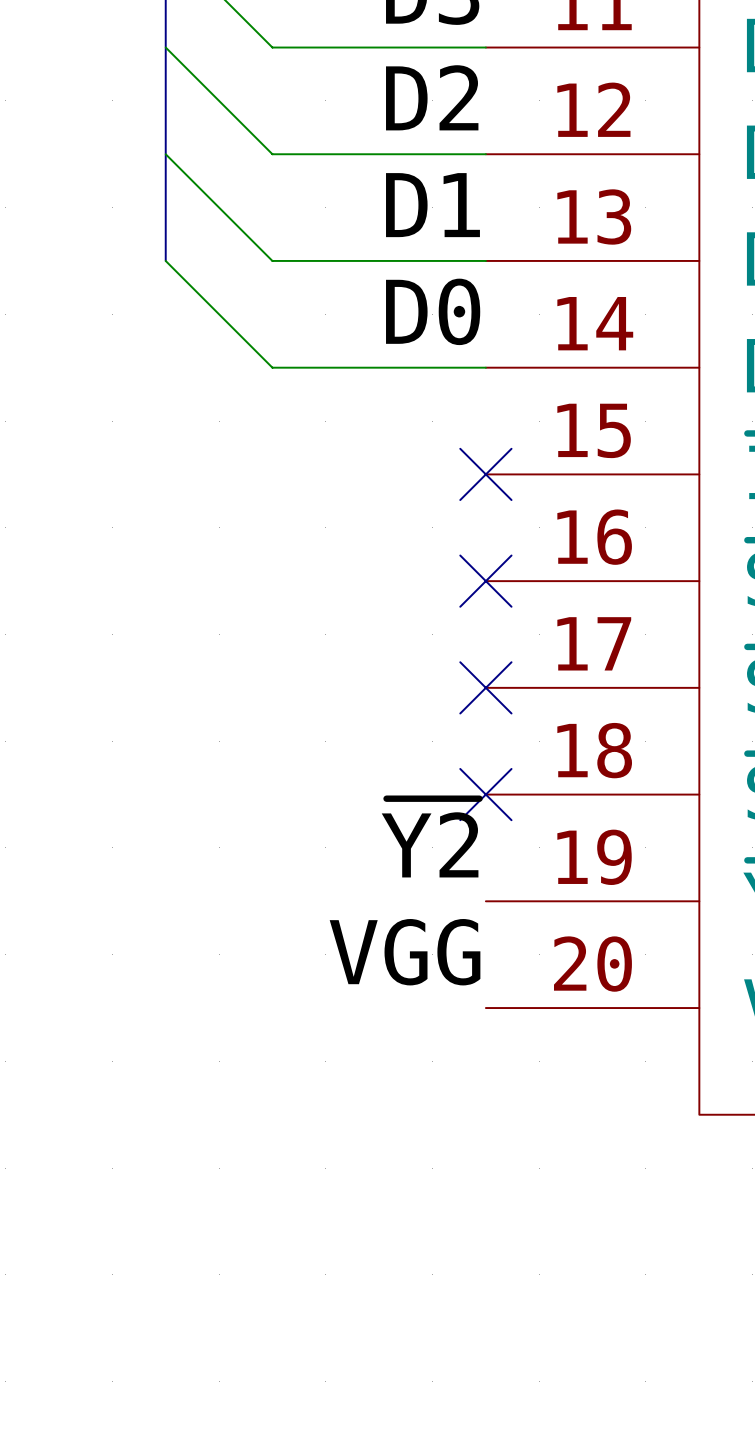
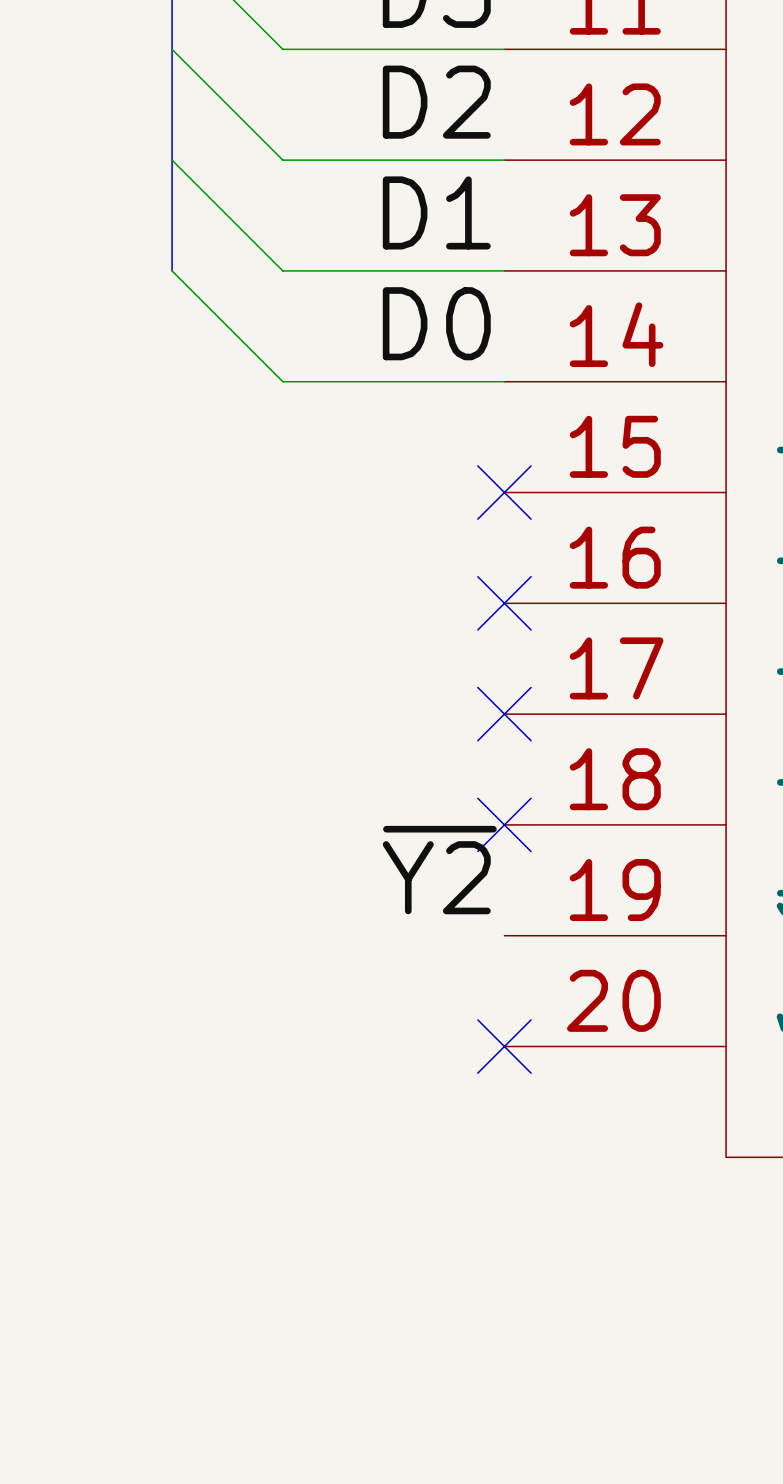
label: VGG (405, 952) -> none
no-connect mark: none -> (504, 1046)

